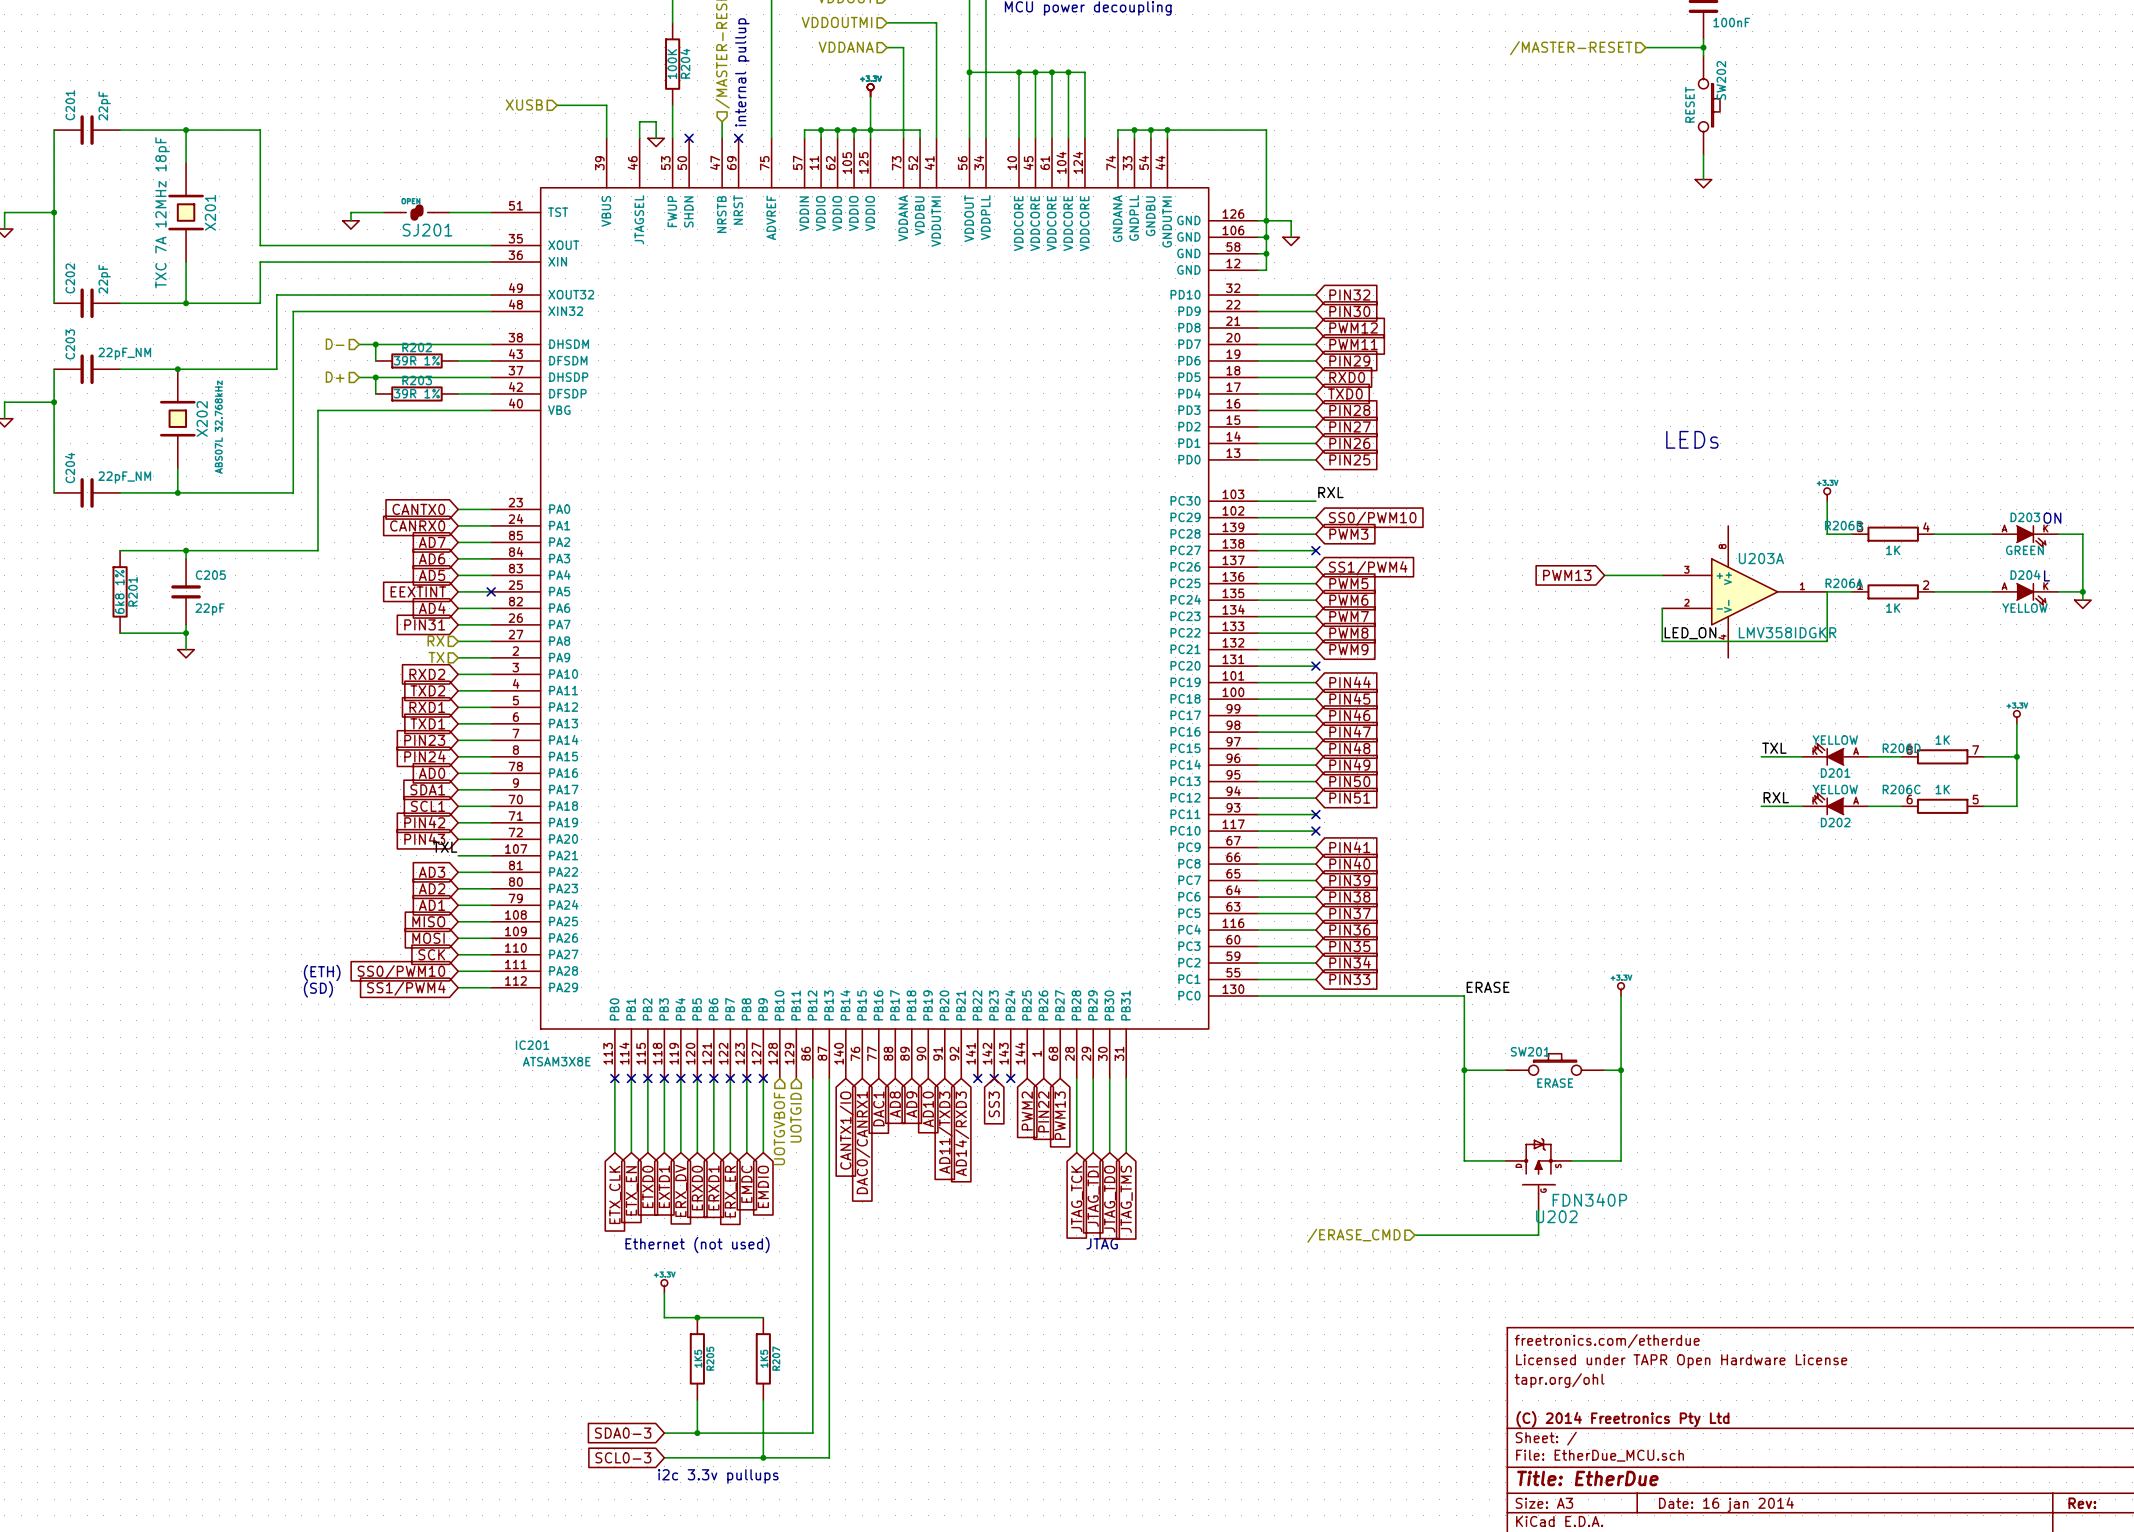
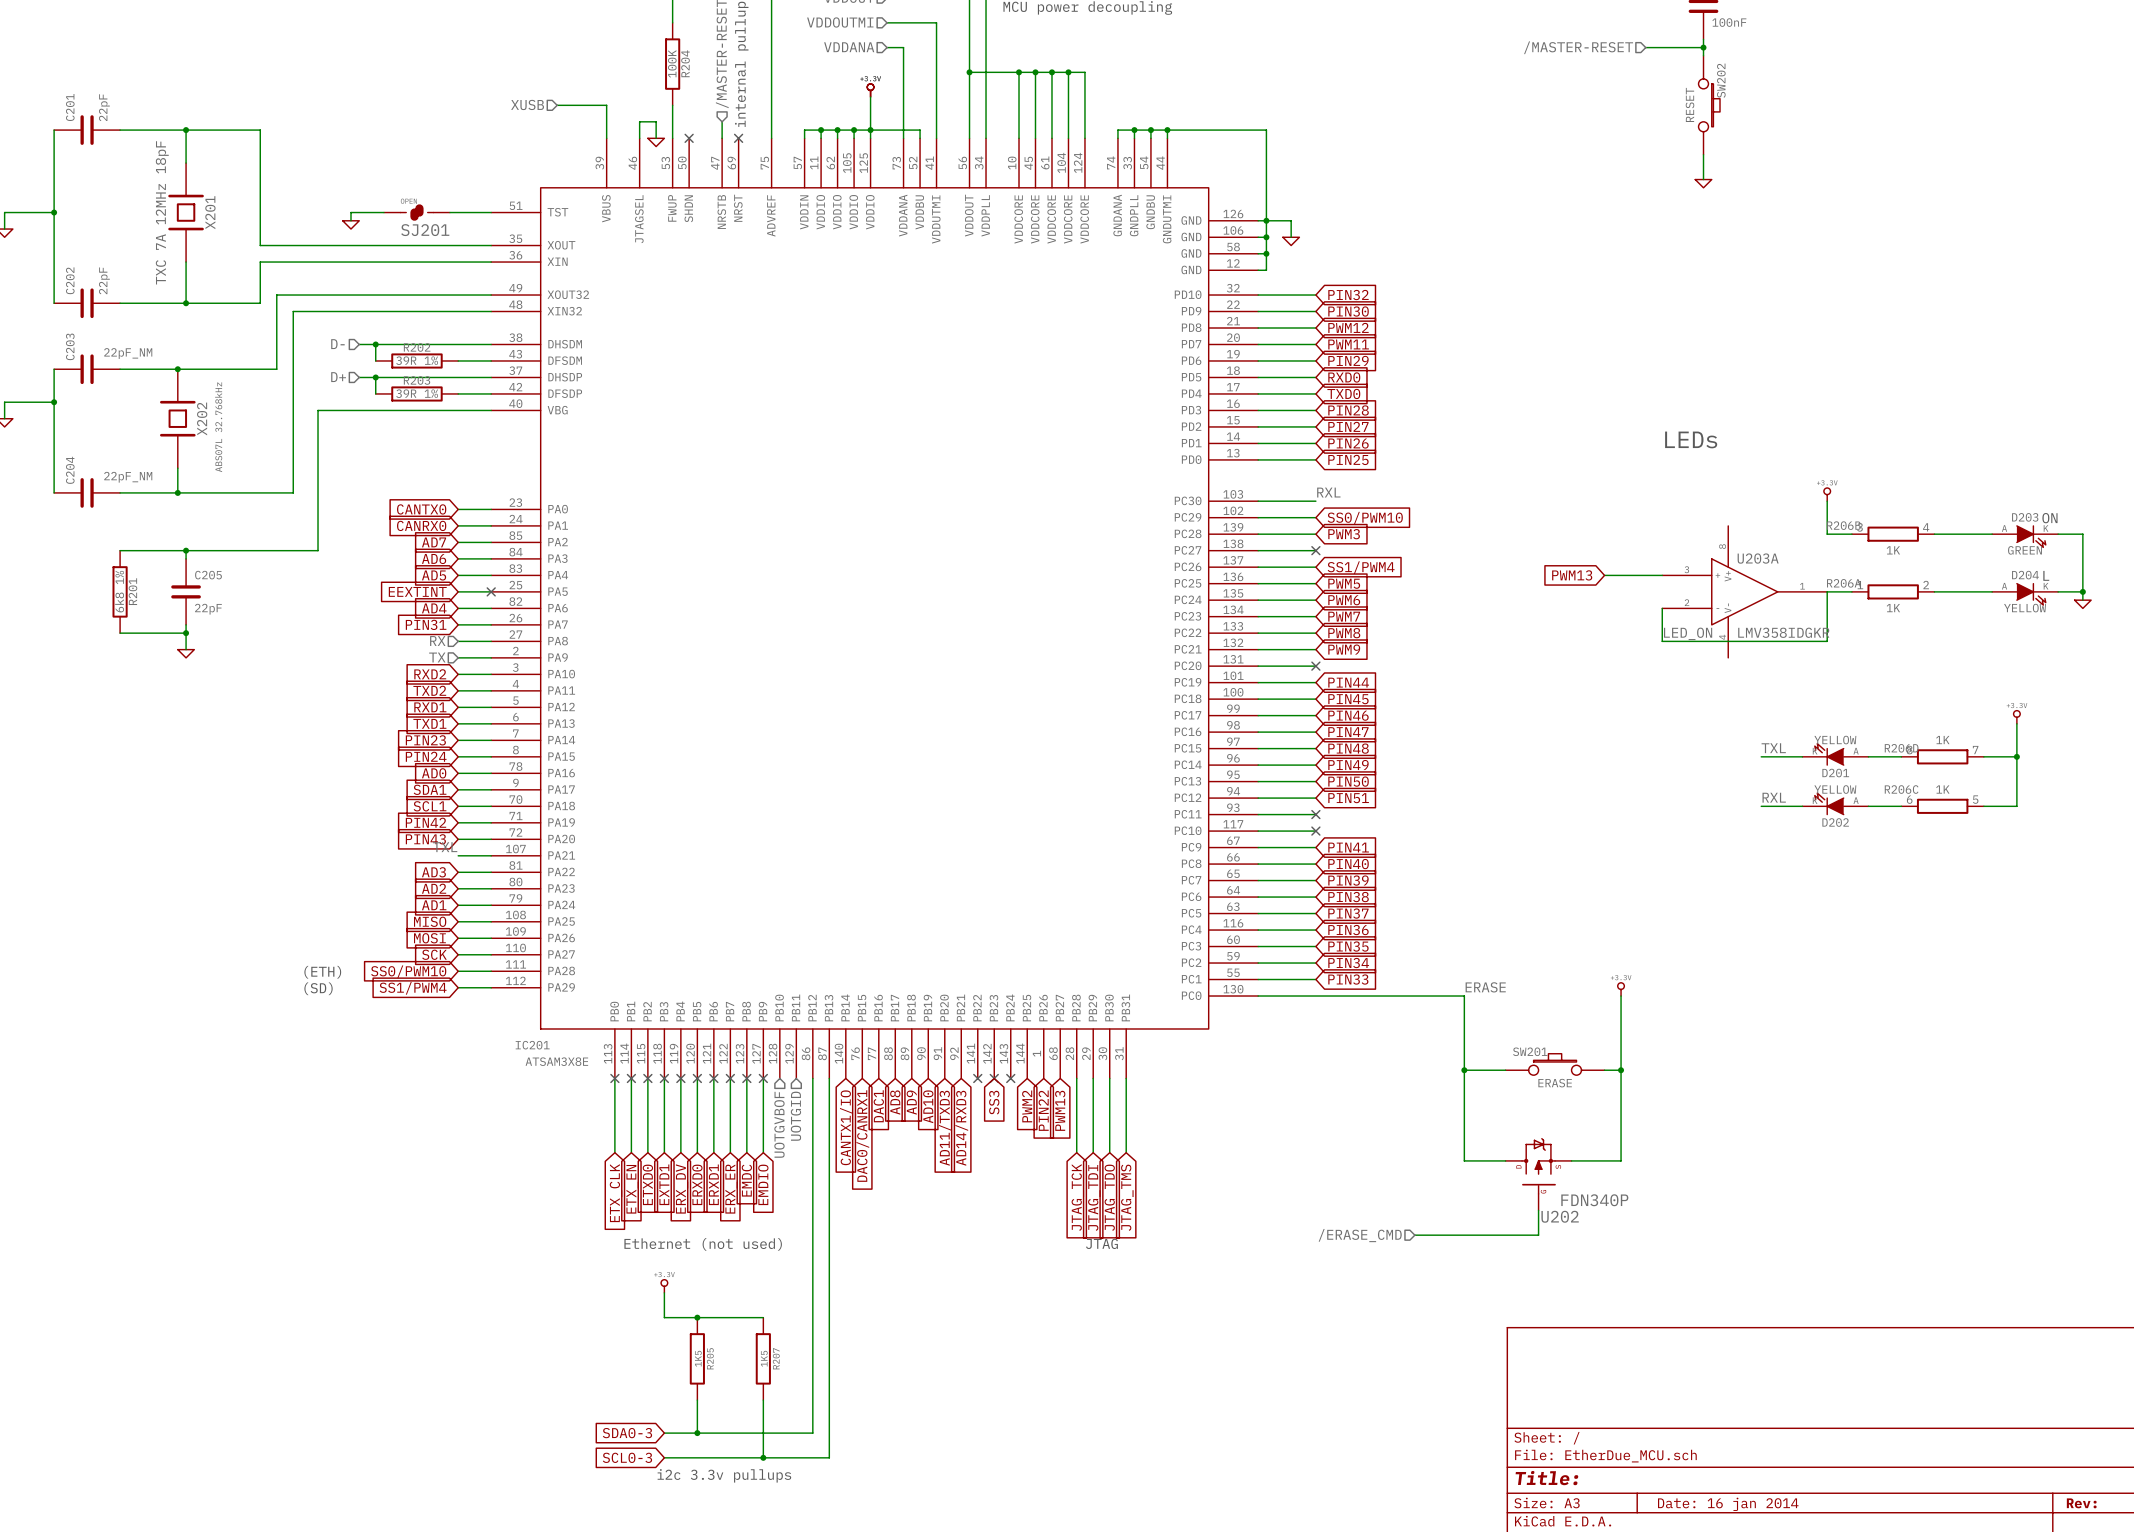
title block: freetronics.com/etherdue (1607, 1341) -> none
title block: Licensed under TAPR Open Hardware License (1681, 1361) -> none
title block: tapr.org/ohl (1559, 1380) -> none
title block: (C) 2014 Freetronics Pty Ltd (1622, 1419) -> none
title block: Title: EtherDue (1587, 1478) -> Title: (1546, 1478)

